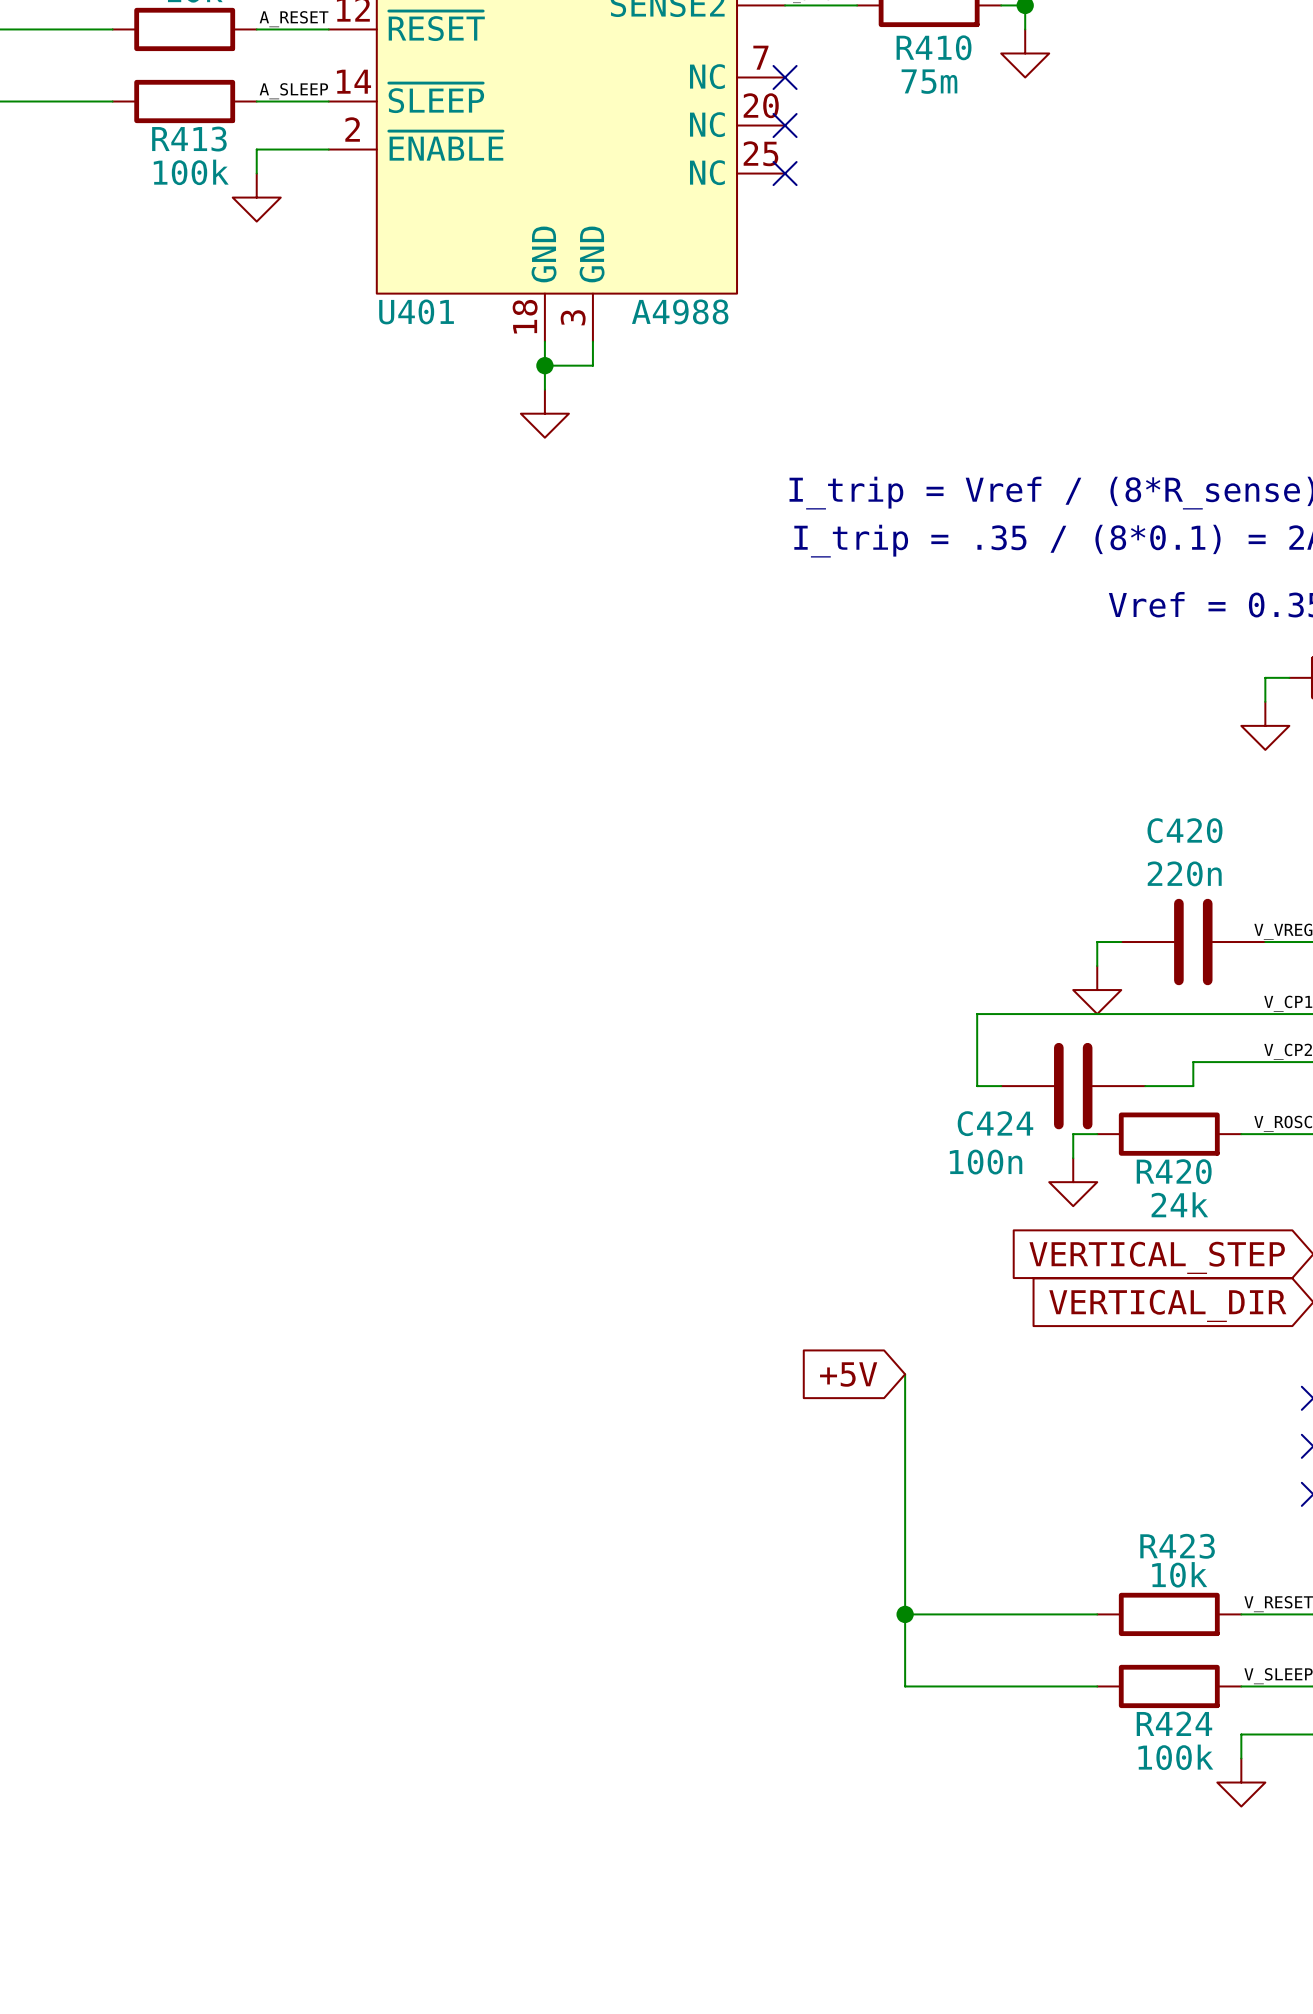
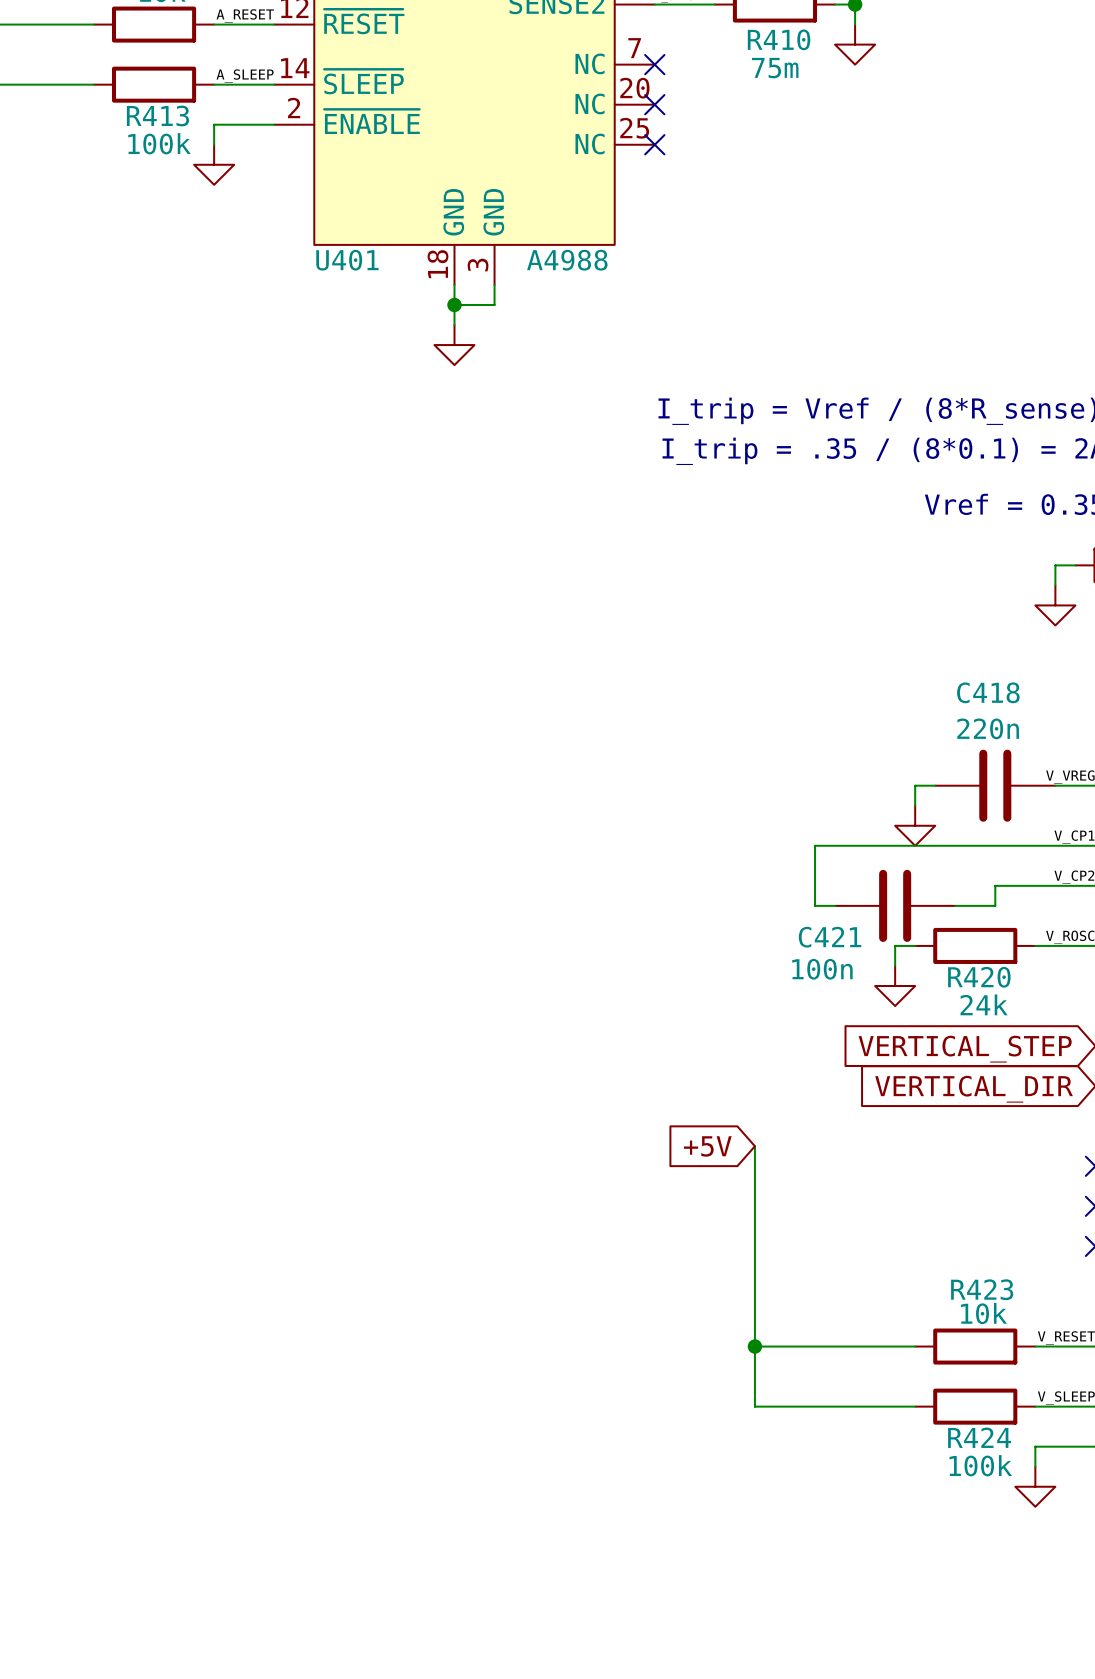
C420 name: C420 (1184, 830) -> C418 (988, 692)
C424 name: C424 (995, 1123) -> C421 (830, 937)

